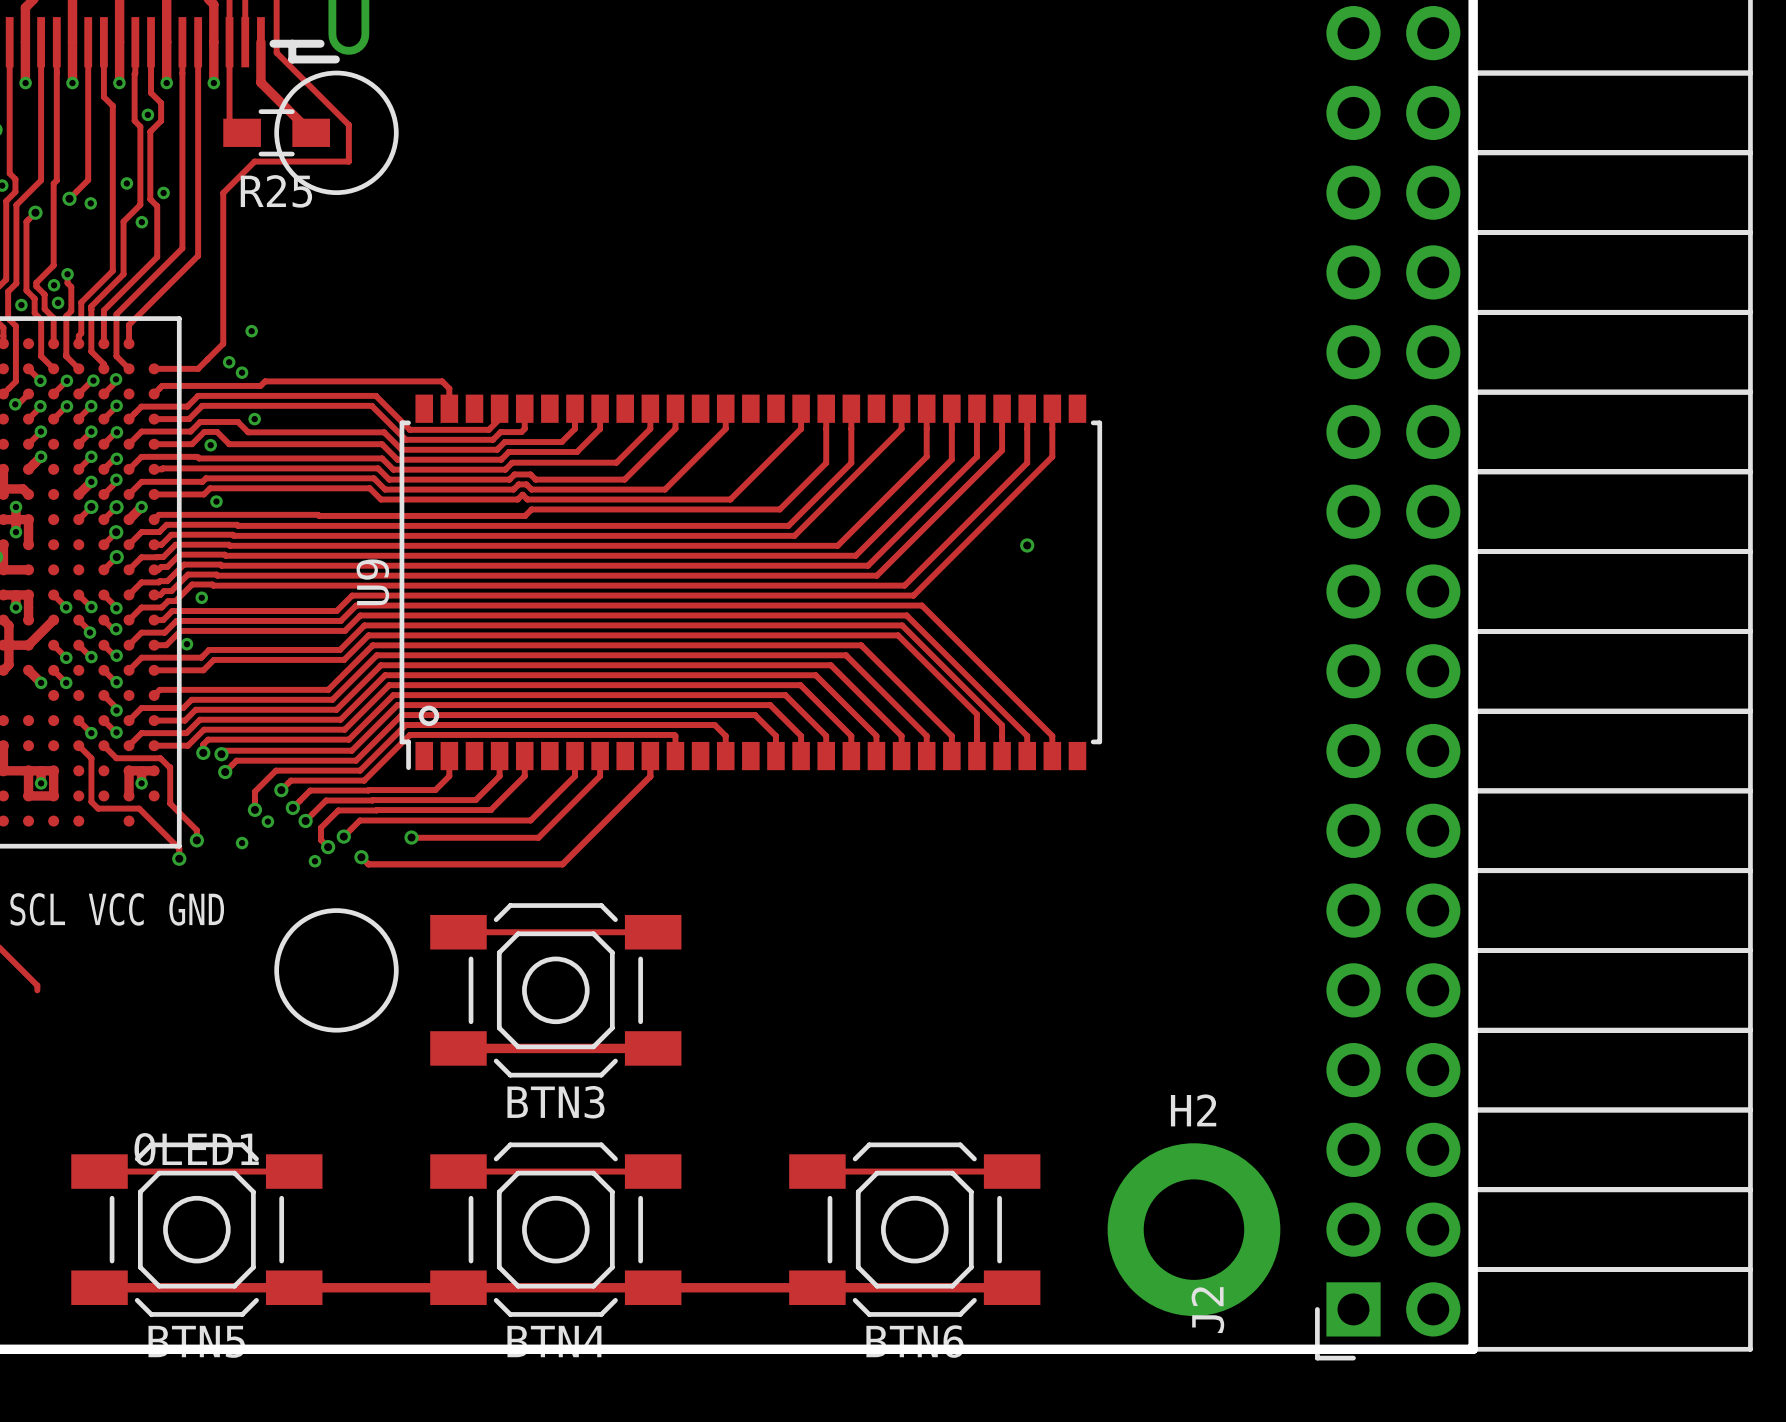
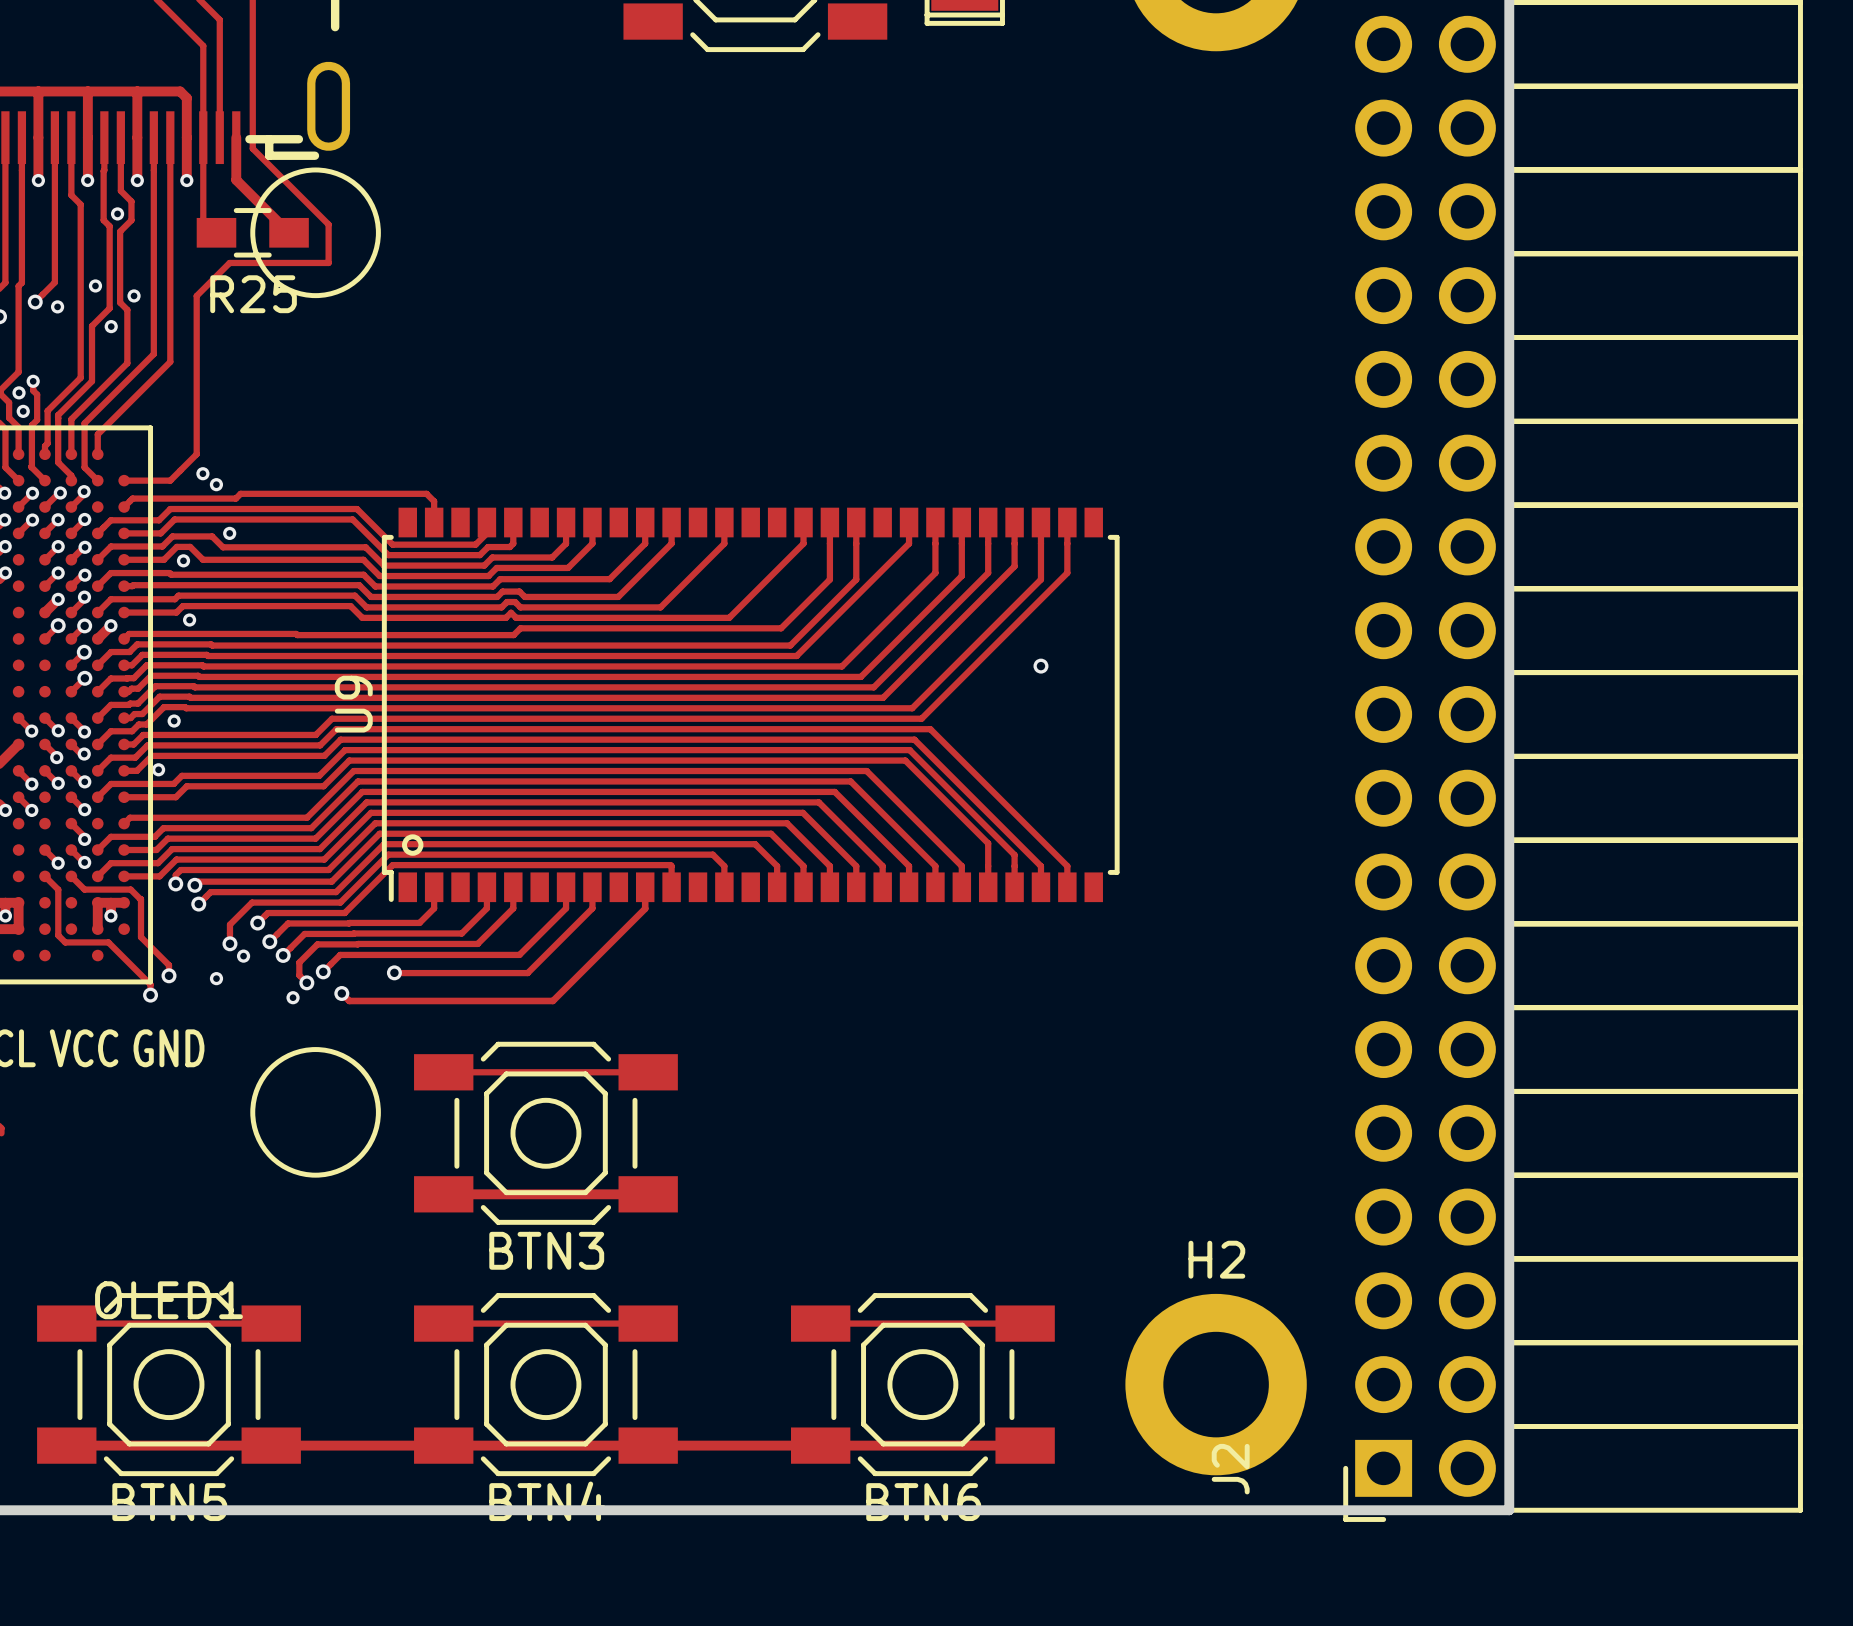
via: (251, 331) -> none

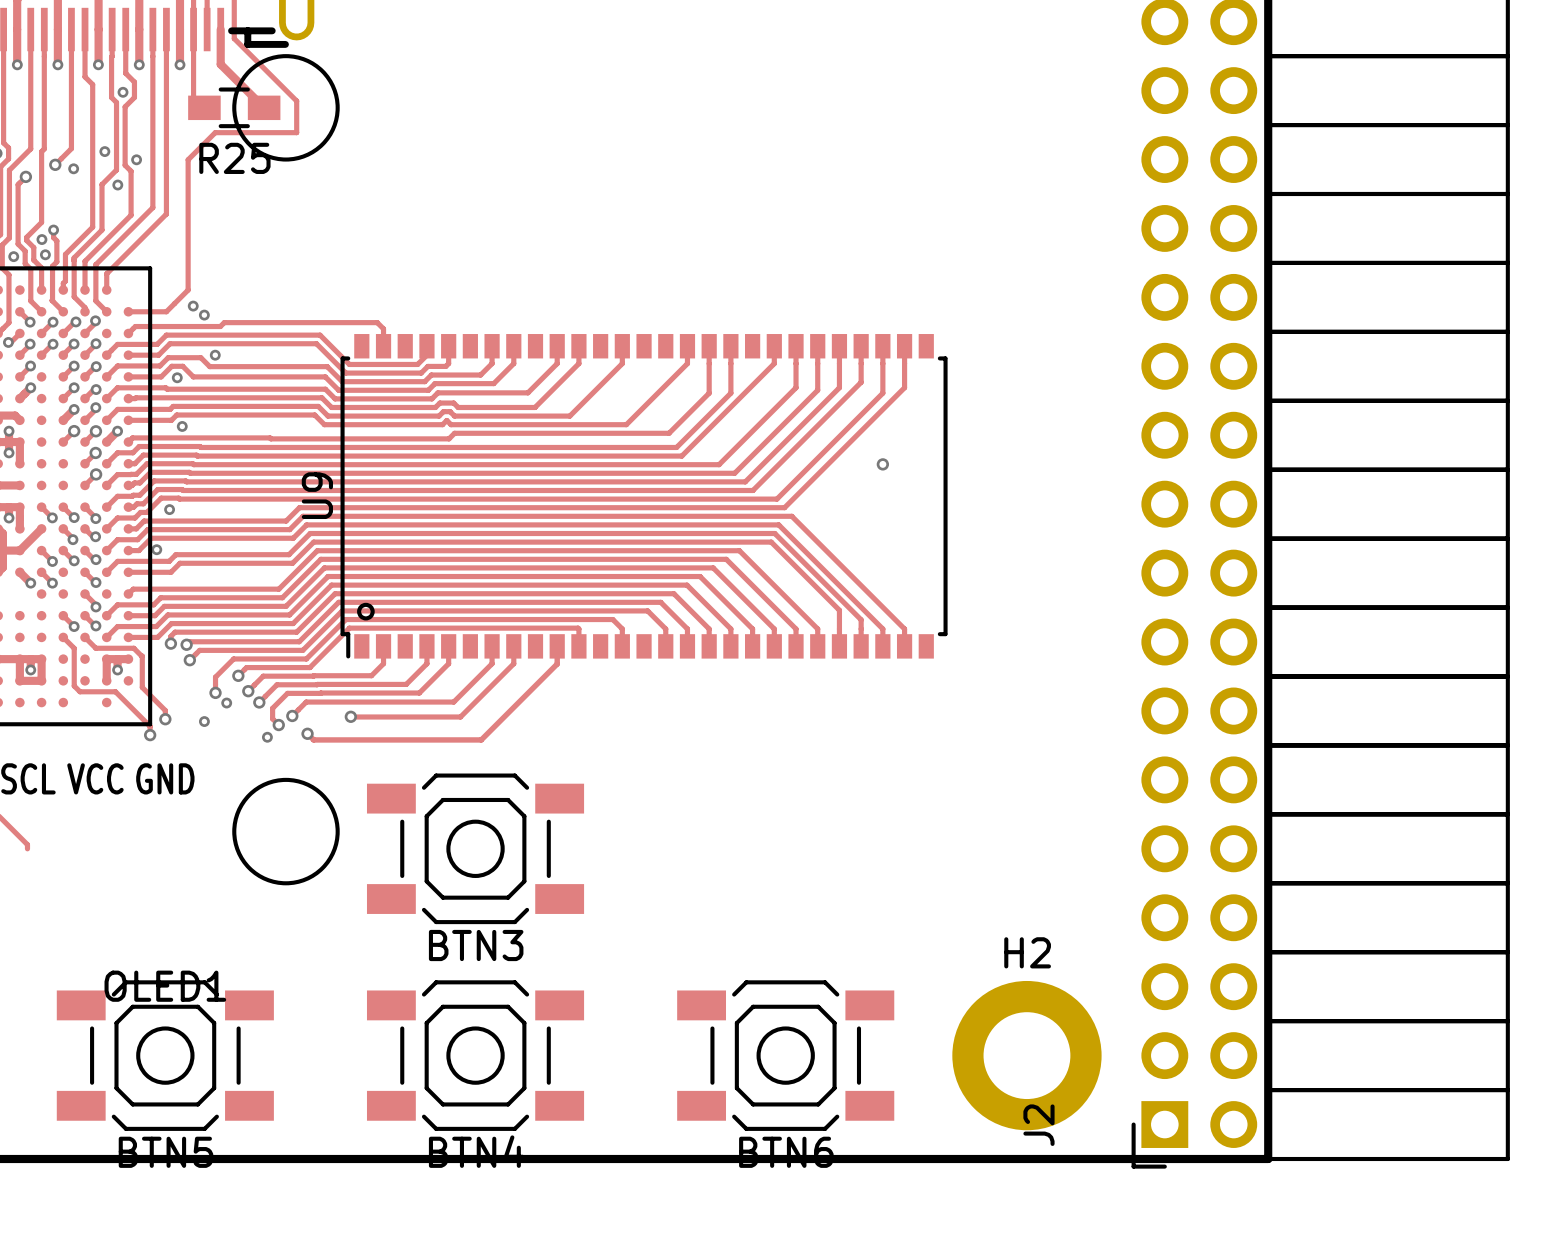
track: (443, 1072) (648, 1072) -> none
track: (443, 1194) (648, 1194) -> none
track: (66, 1323) (271, 1323) -> none
track: (443, 1323) (648, 1323) -> none
track: (820, 1323) (1025, 1323) -> none
track: (66, 1445) (1025, 1445) -> none

